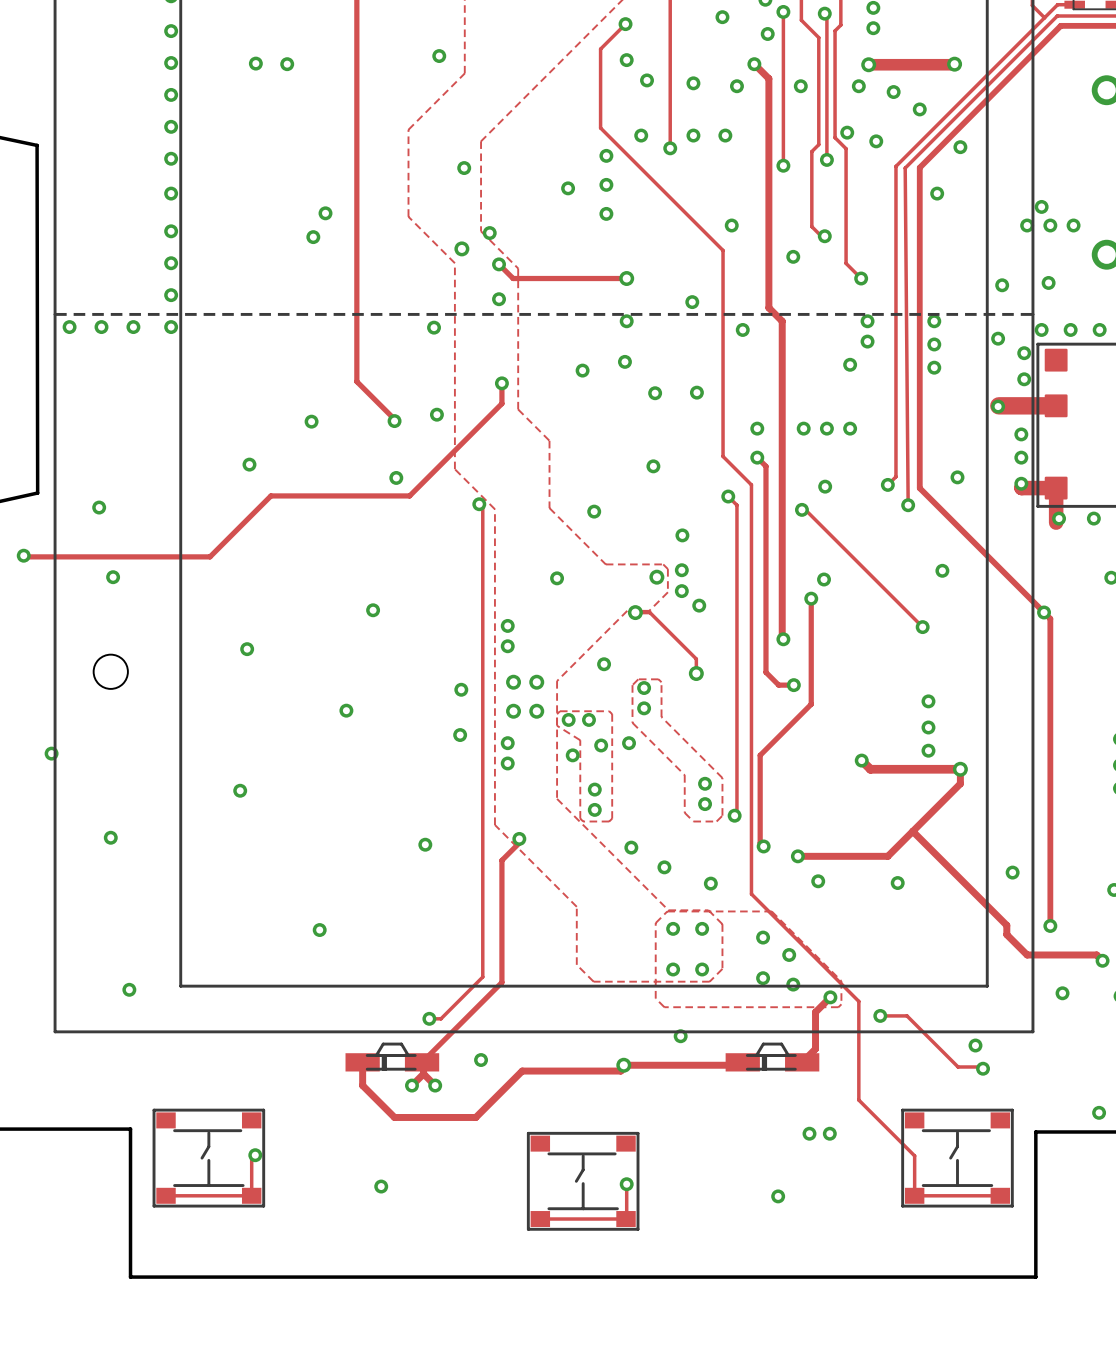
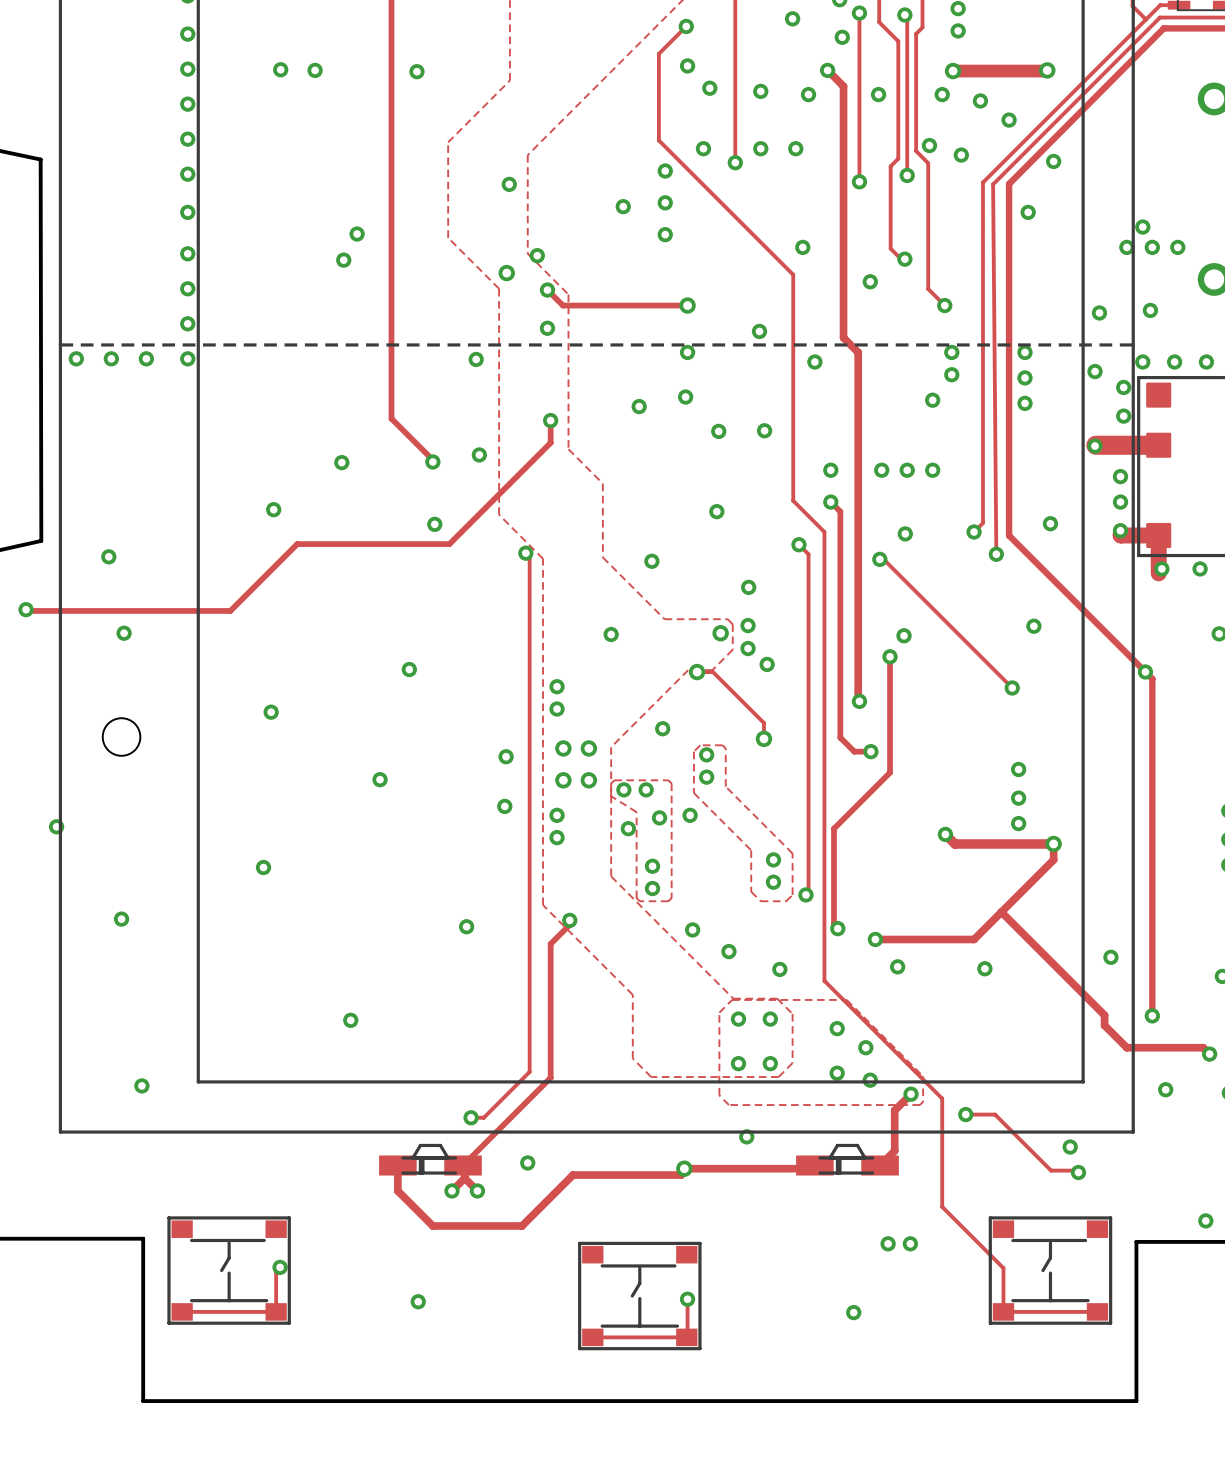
via: (439, 56) -> none
via: none -> (416, 71)

